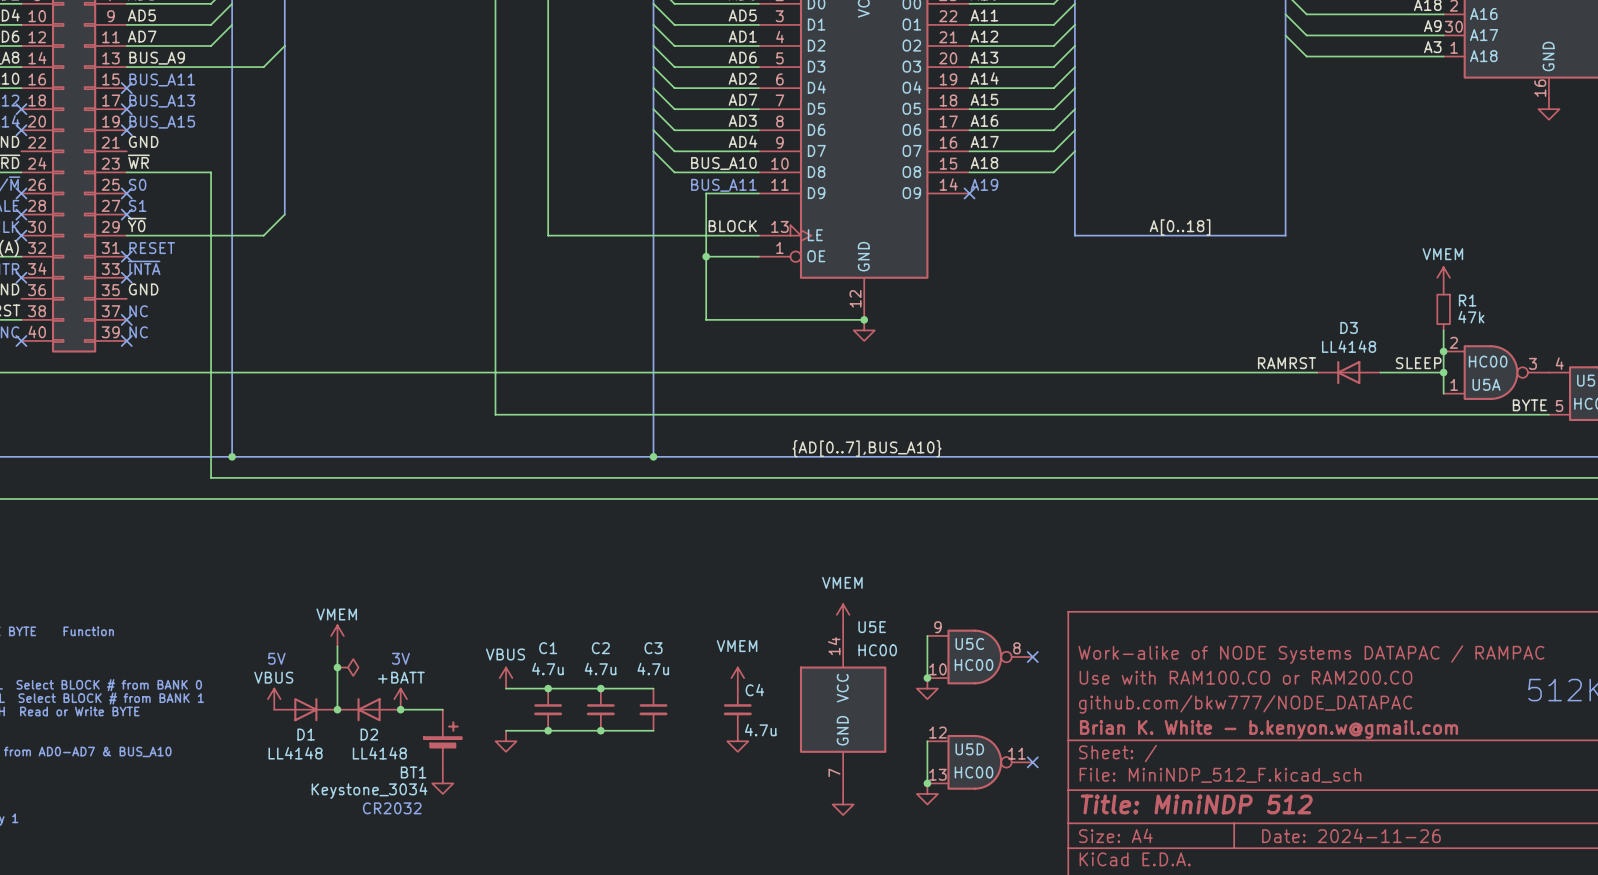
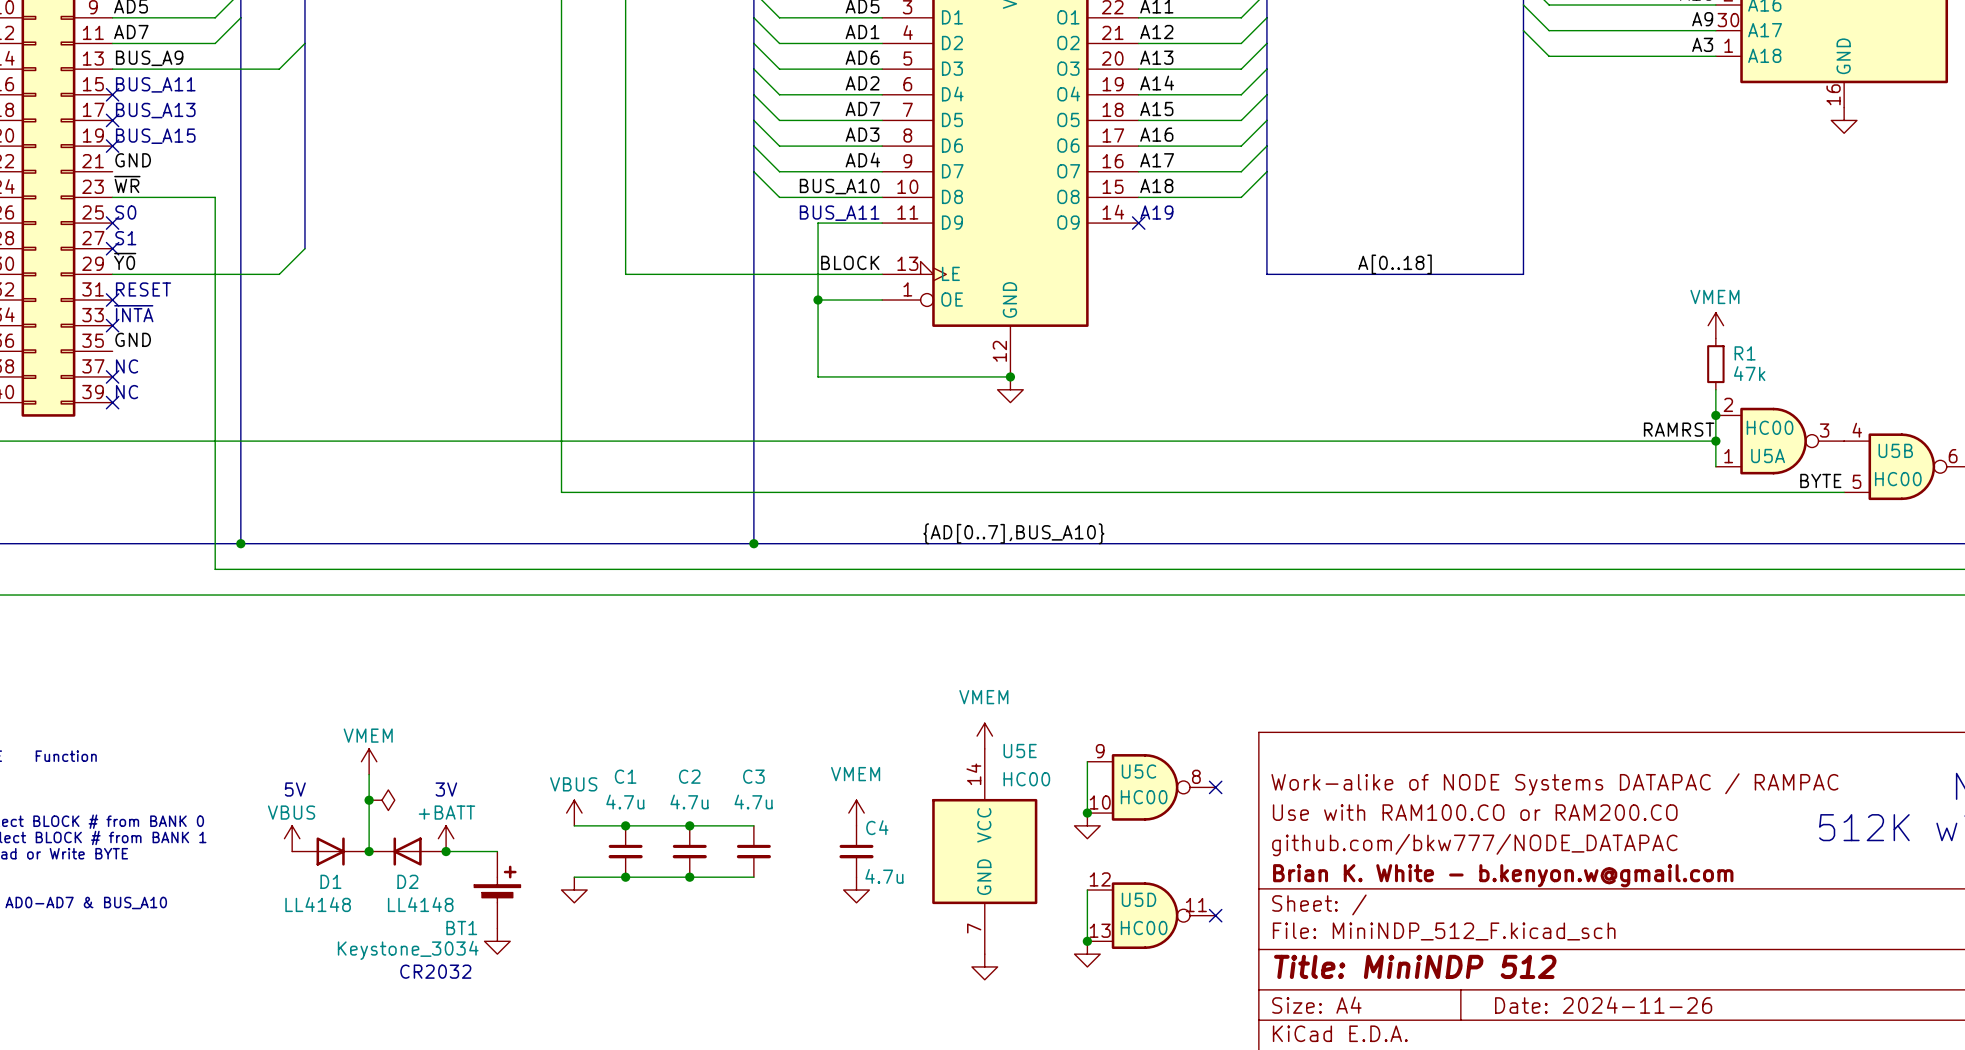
label: RAMRST (1287, 363) -> none
label: SLEEP (1418, 363) -> RAMRST (1679, 429)
D3: LL4148 (1348, 372) -> none

